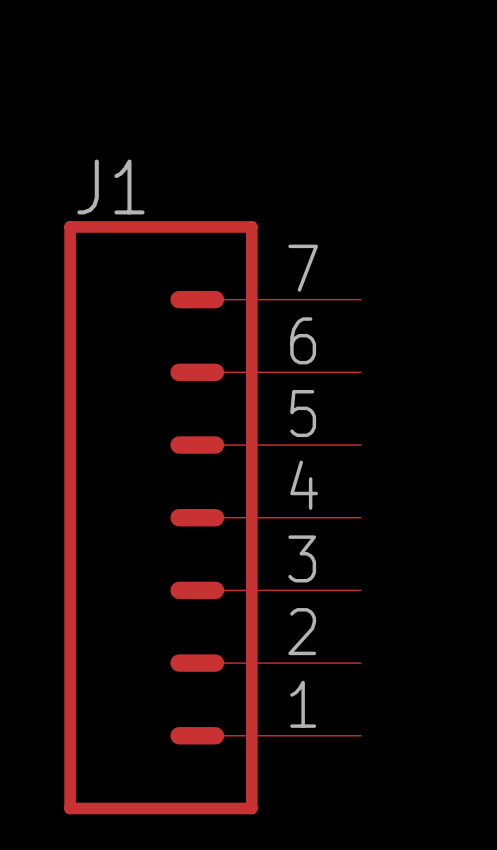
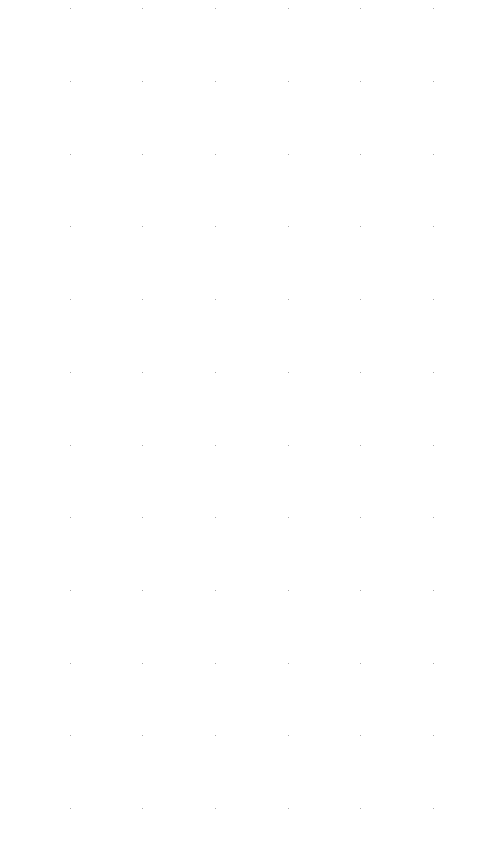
J1: (212, 517) -> none

